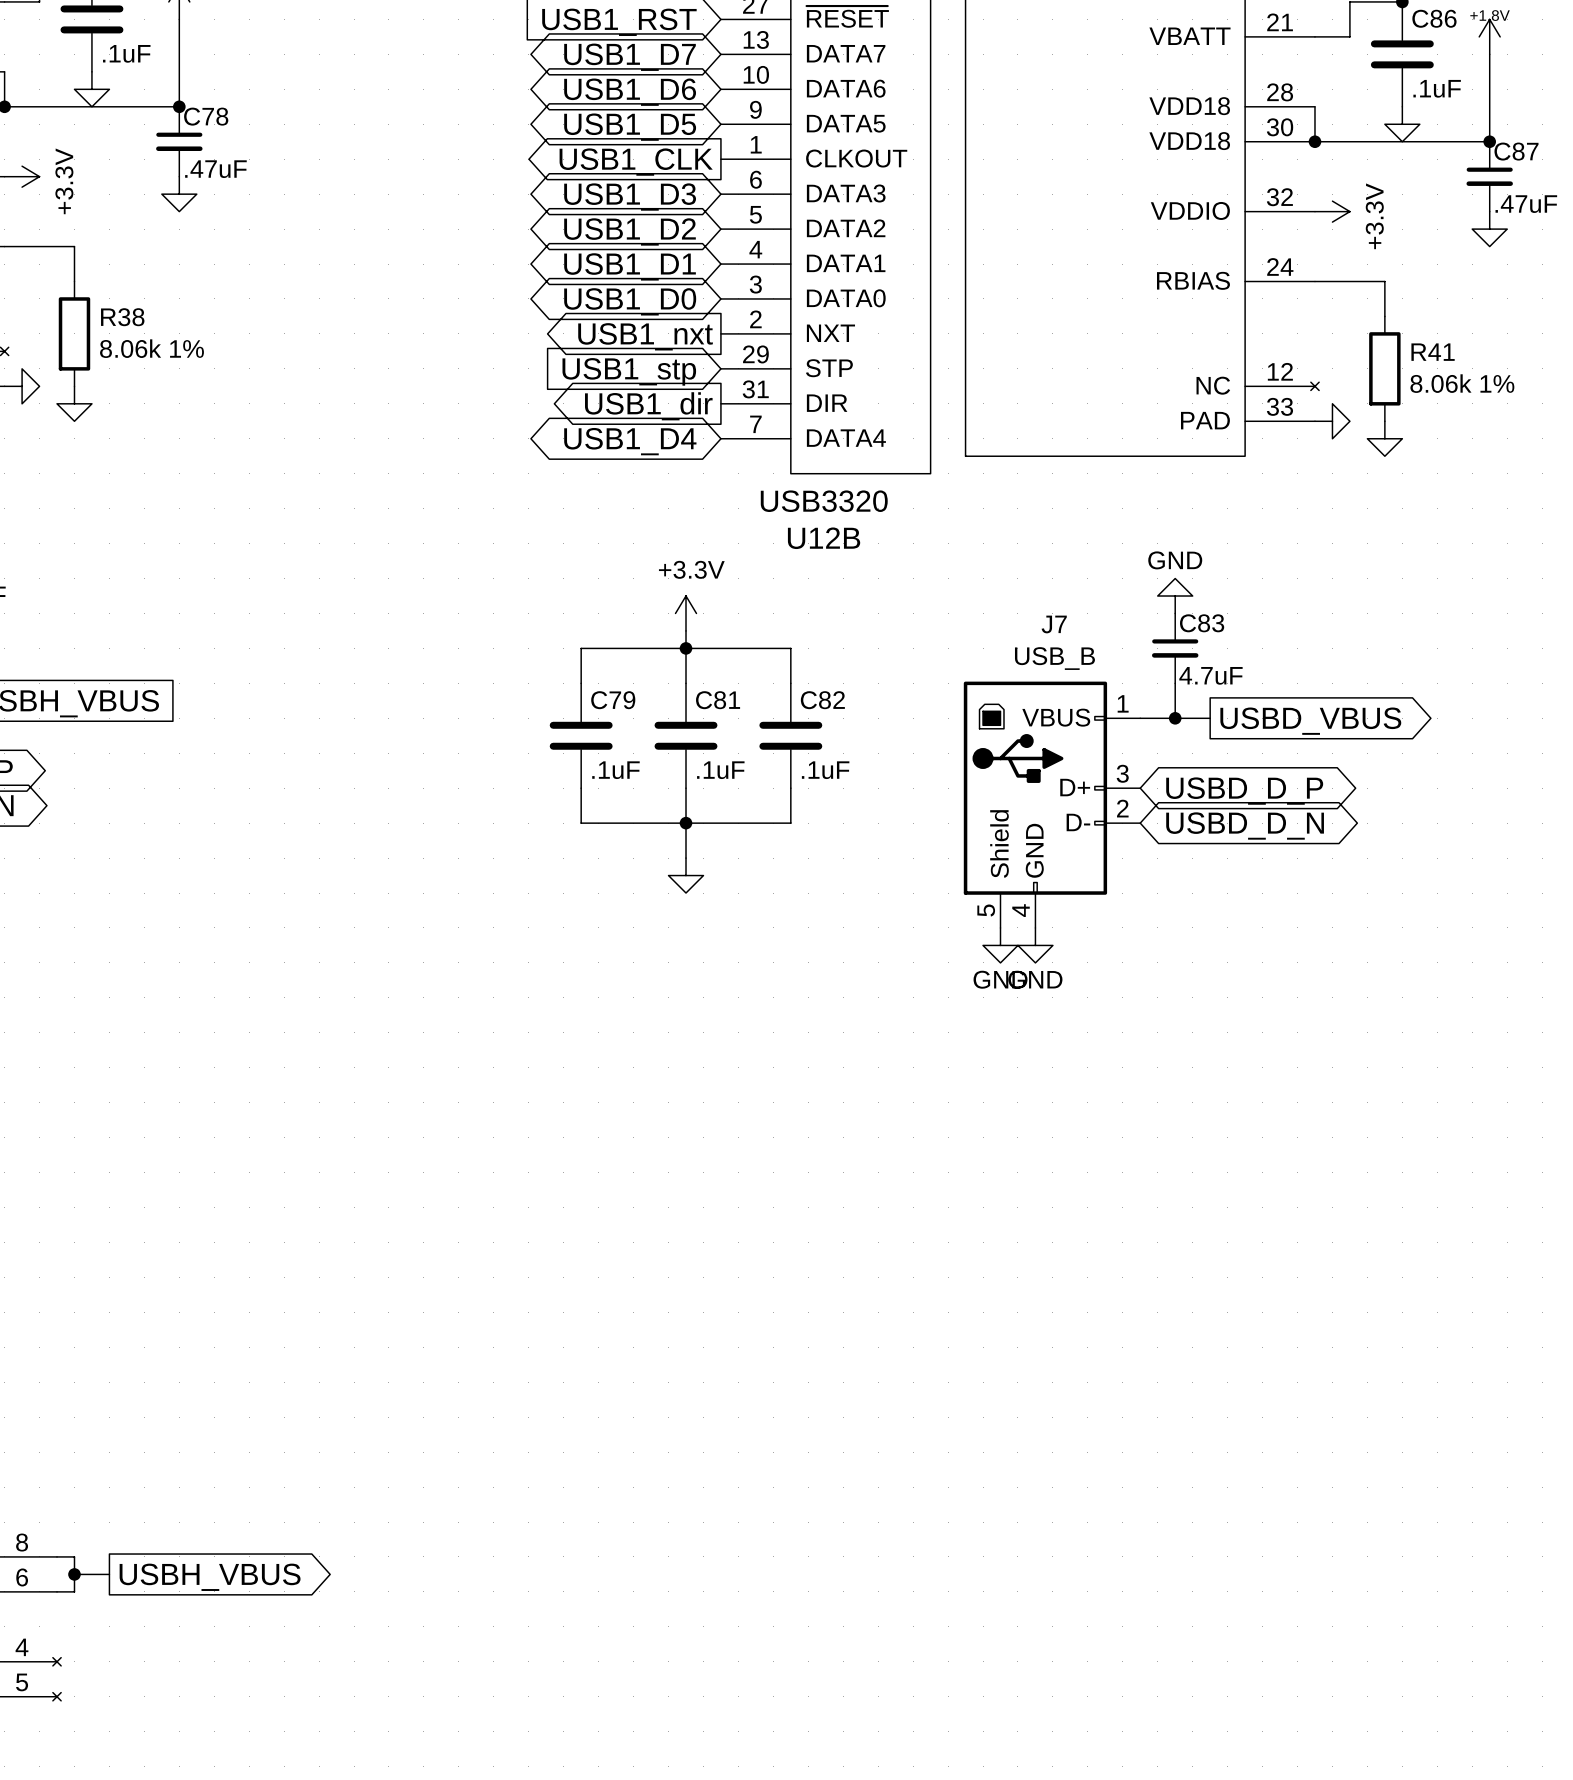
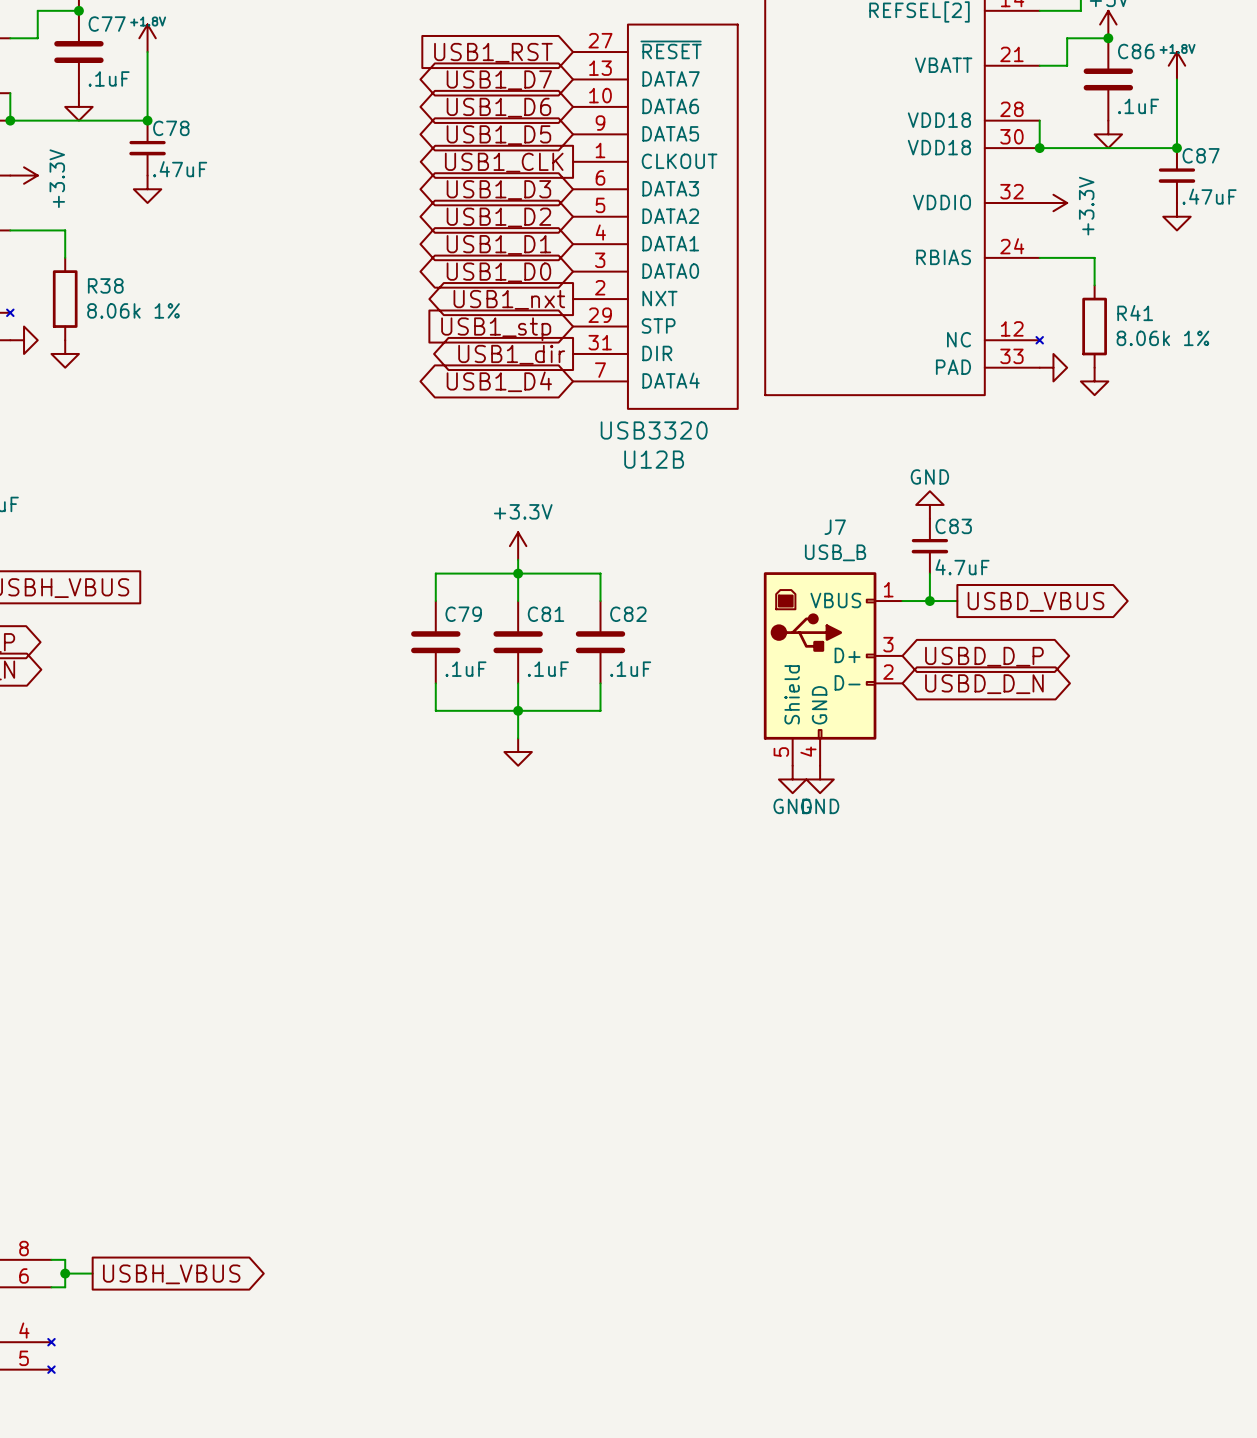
power symbol position: +3.3V (686, 613) -> +3.3V (518, 546)
wire: (686, 630) (686, 683) -> (518, 559) (518, 601)
junction position: (686, 648) -> (518, 573)
wire: (581, 683) (581, 648) (790, 648) (790, 683) -> (435, 601) (435, 573) (600, 573) (600, 601)
C79 position: (581, 735) -> (435, 642)
C81 position: (686, 735) -> (518, 642)
C82 position: (790, 735) -> (600, 642)
wire: (581, 788) (581, 823) (790, 823) (790, 788) -> (435, 683) (435, 710) (600, 710) (600, 683)
wire: (686, 788) (686, 858) -> (518, 683) (518, 738)
junction position: (686, 823) -> (518, 710)
power symbol position: (686, 875) -> (518, 752)

